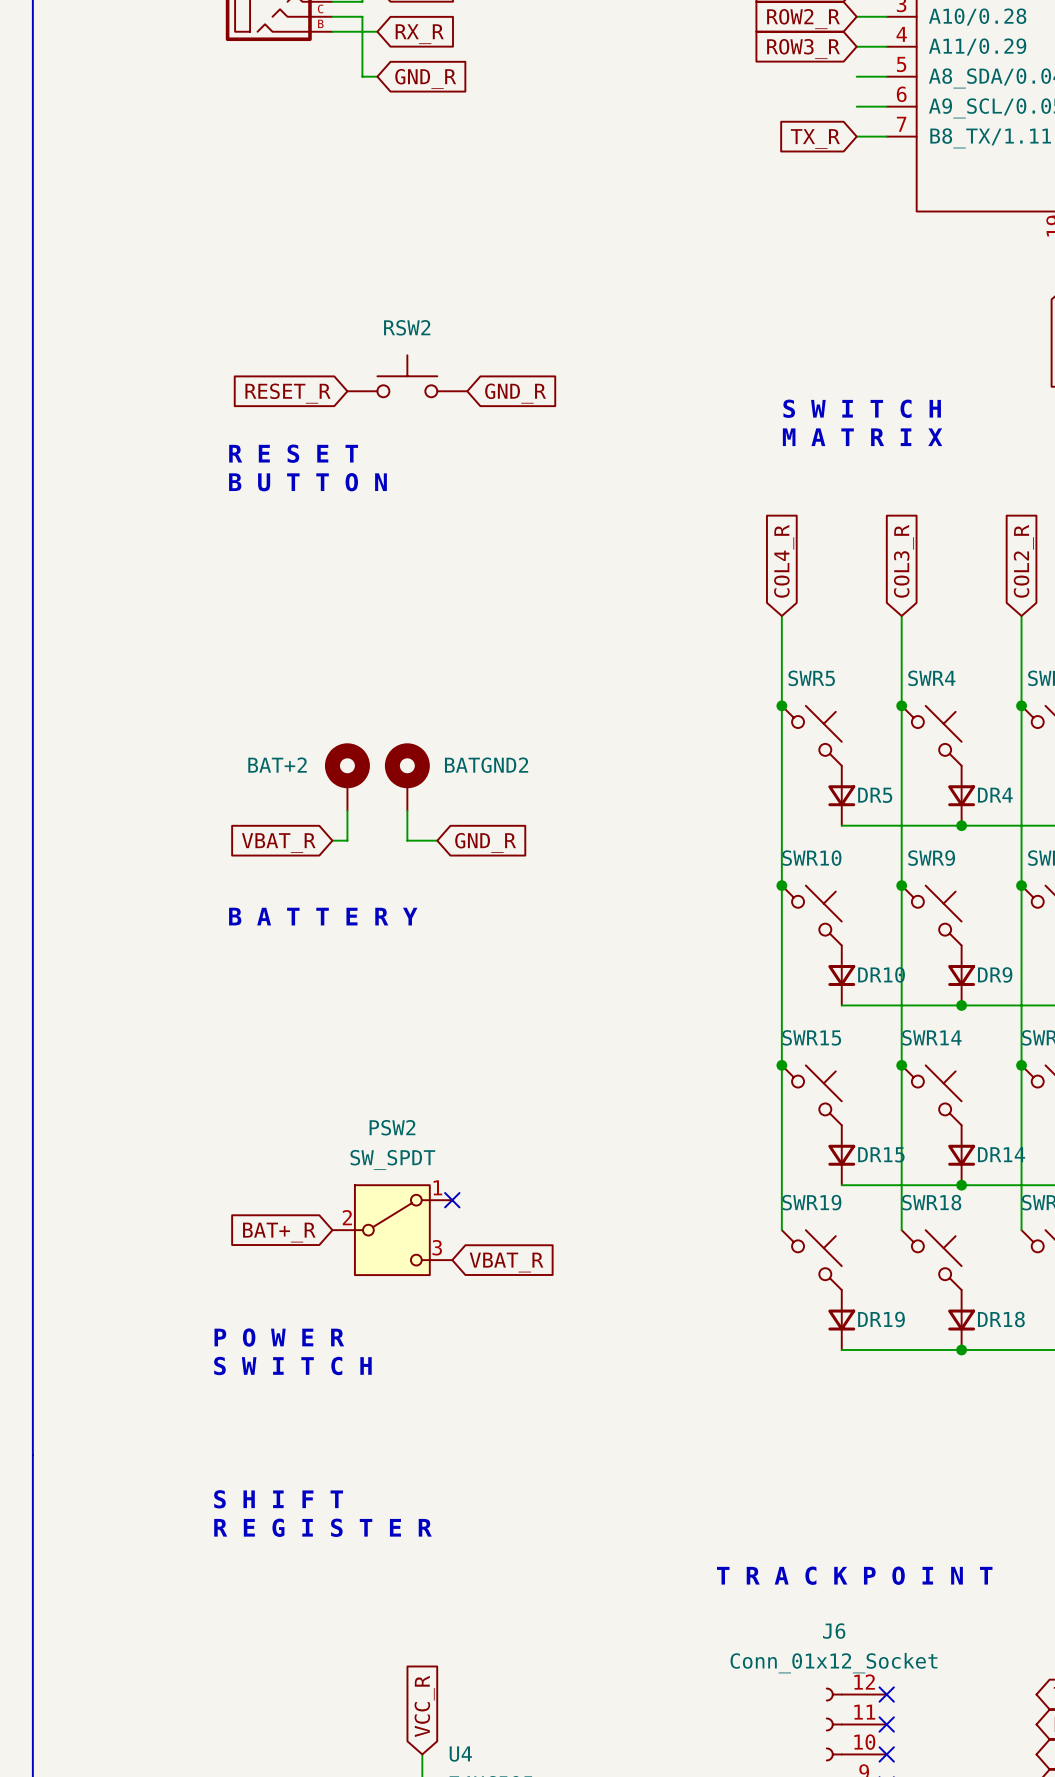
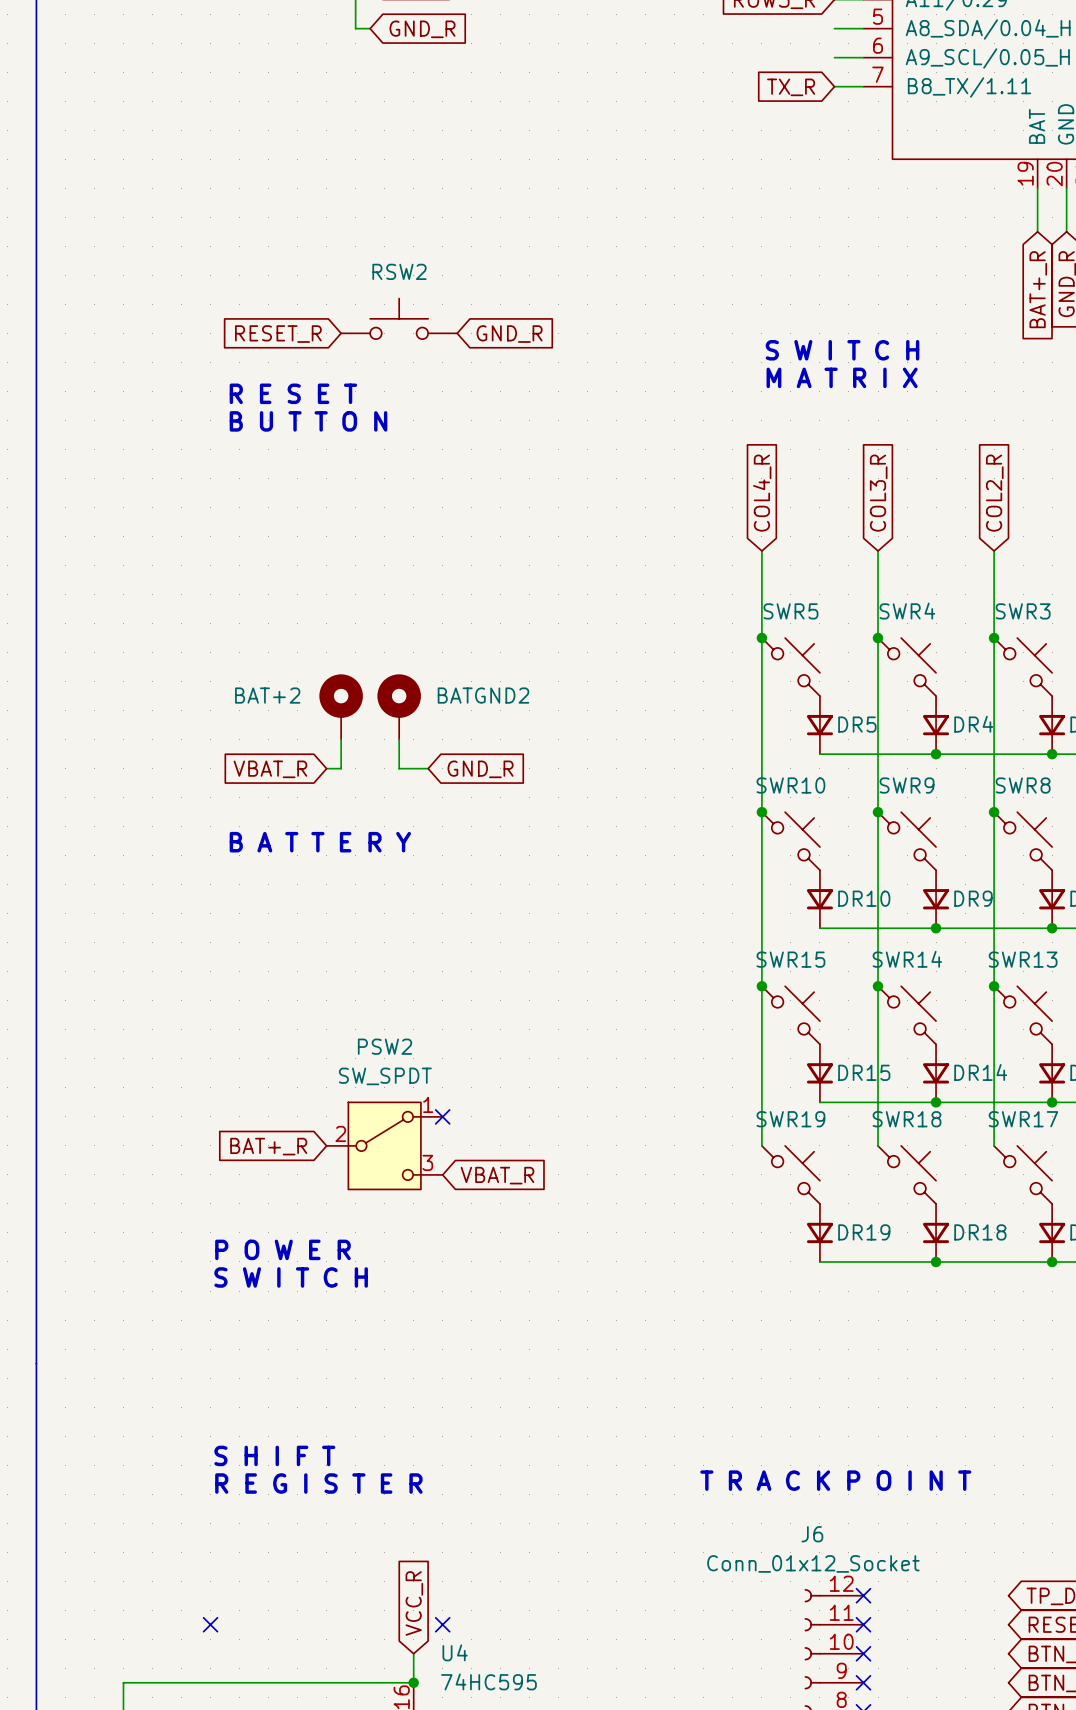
text position: S H I F T (278, 1499) -> S H I F T (274, 1455)
text position: R E G I S T E R (322, 1527) -> R E G I S T E R (318, 1483)
no-connect mark: none -> (210, 1624)
no-connect mark: none -> (442, 1624)

